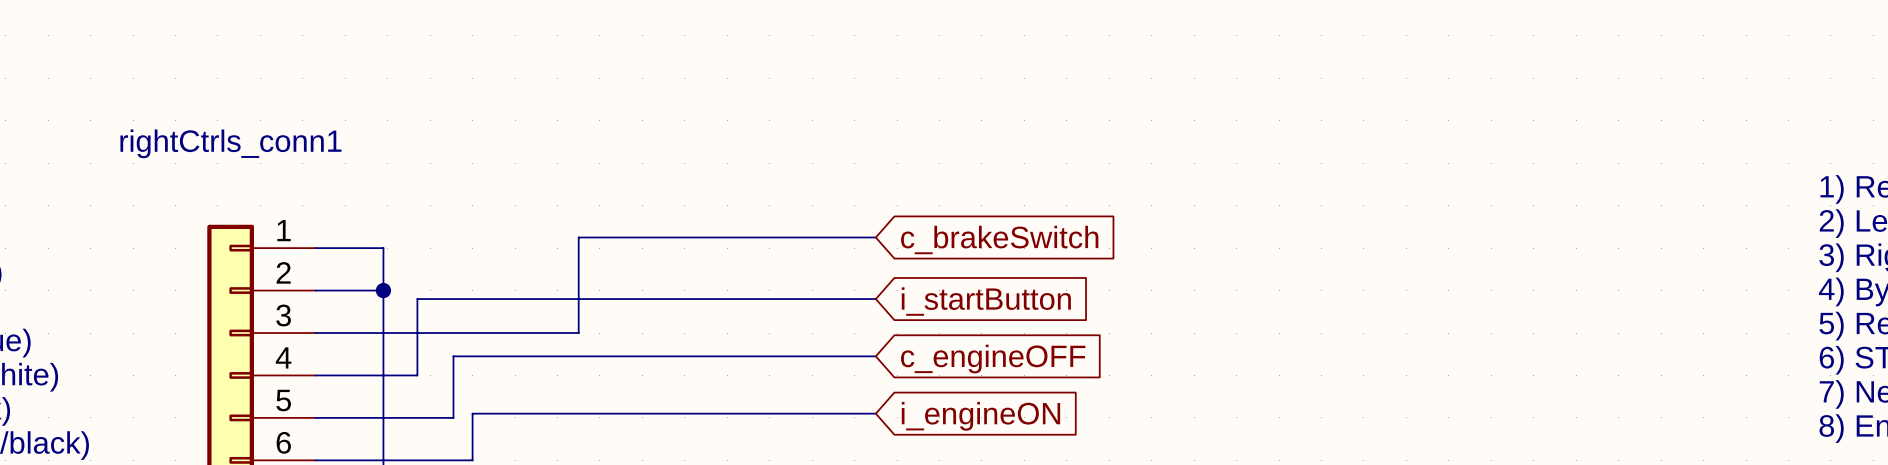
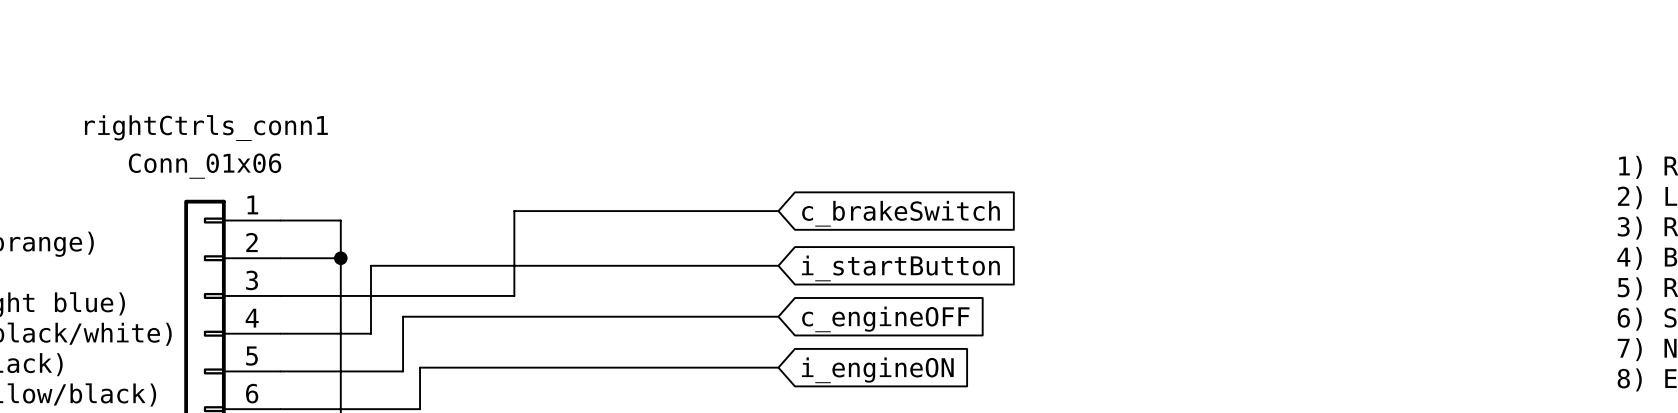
rightCtrls_conn1 value: none -> Conn_01x06 (205, 166)

